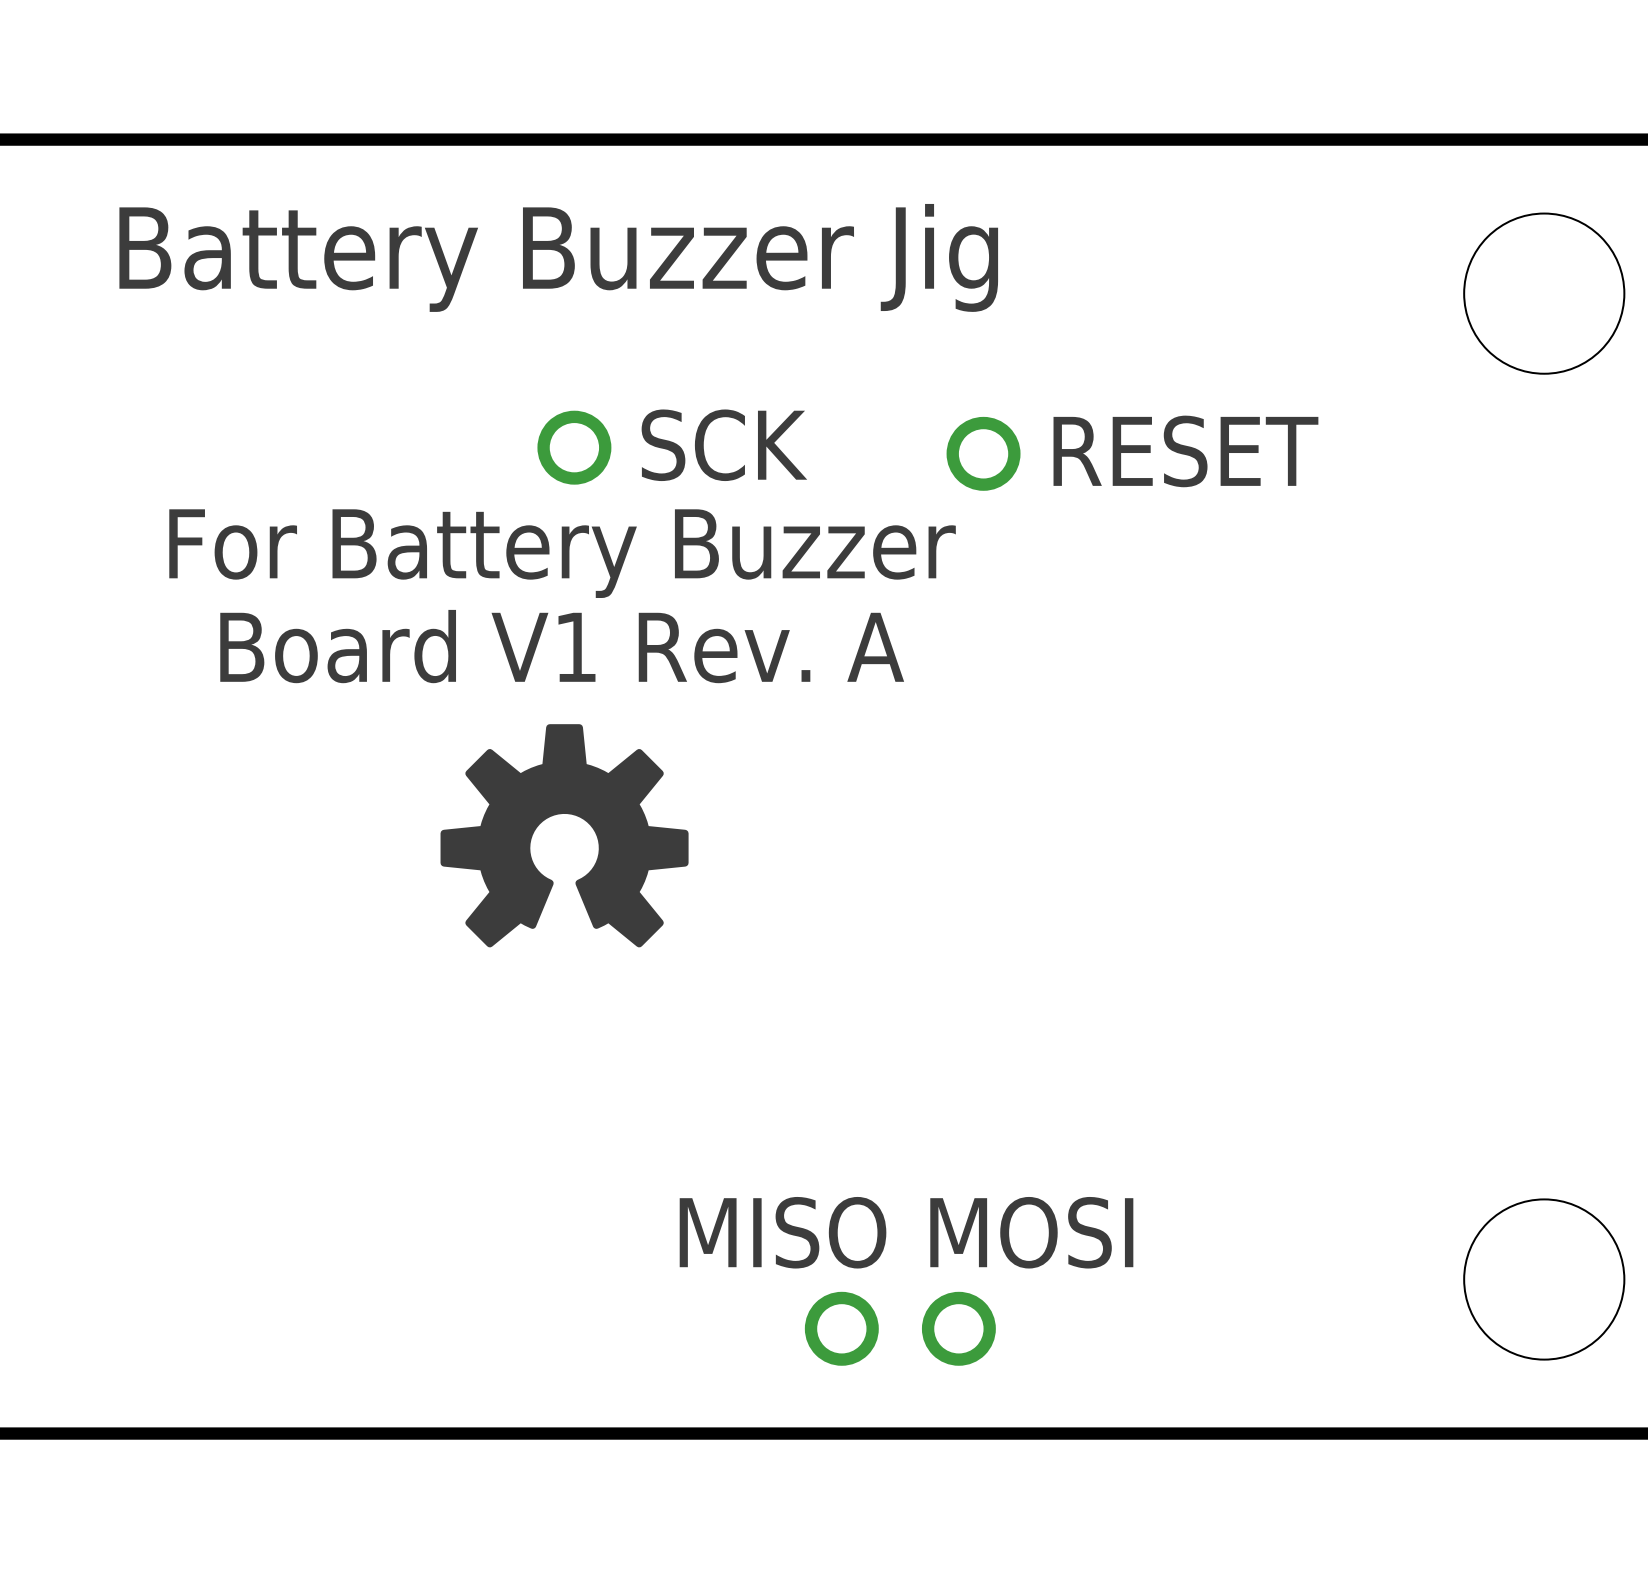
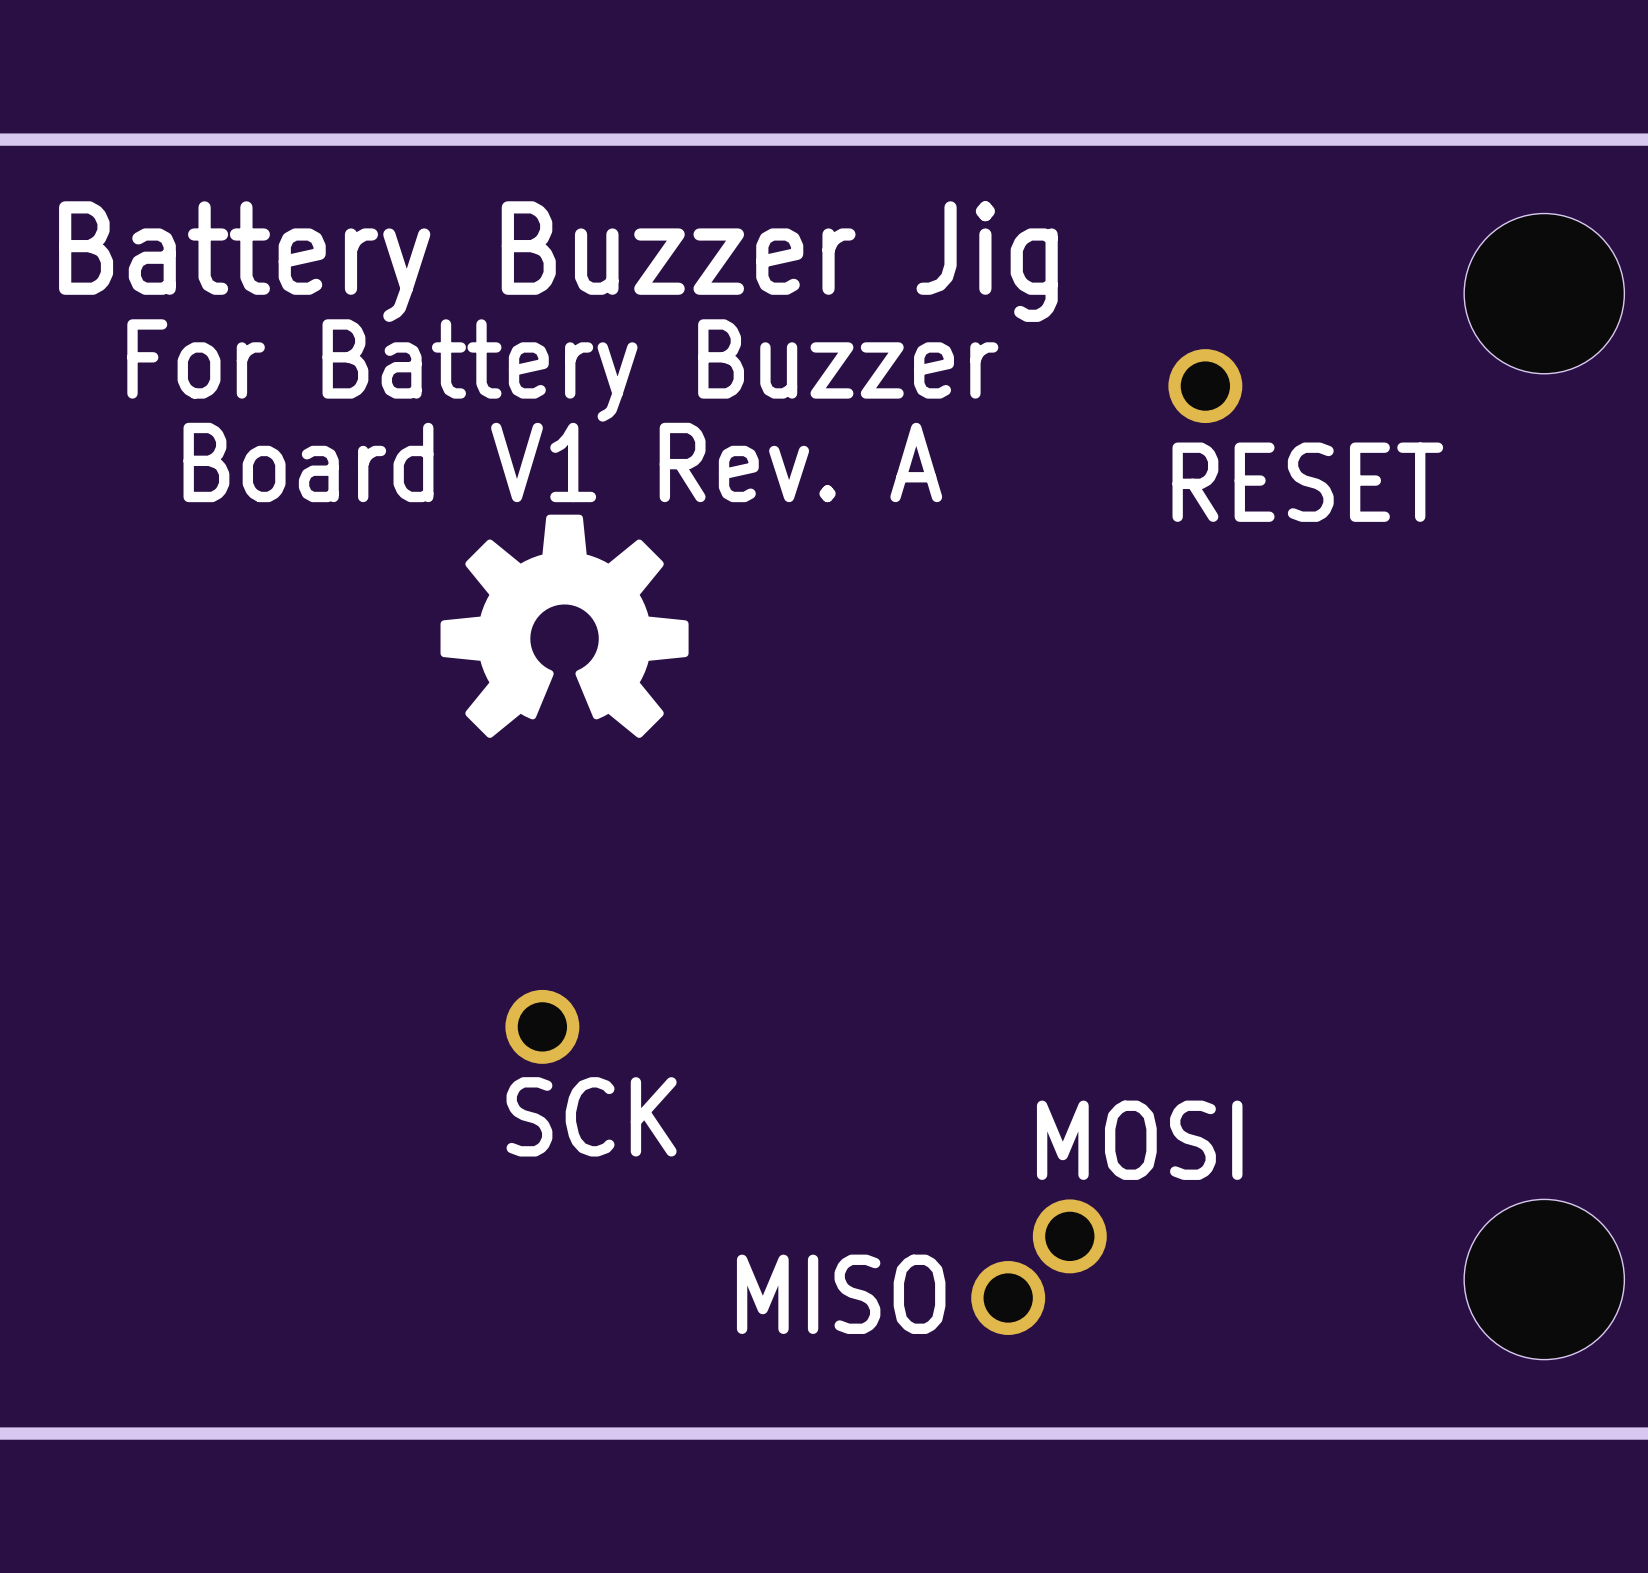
SCK name position: SCK (724, 445) -> SCK (591, 1116)
SCK position: (574, 447) -> (542, 1026)
RESET name position: RESET (1185, 451) -> RESET (1307, 482)
RESET position: (983, 453) -> (1205, 386)
text position: For Battery Buzzer (562, 553) -> For Battery Buzzer (562, 370)
text position: Board V1 Rev. A (562, 646) -> Board V1 Rev. A (562, 462)
drawing position: (564, 835) -> (564, 626)
MISO name position: MISO (783, 1232) -> MISO (841, 1294)
MOSI name position: MOSI (1031, 1232) -> MOSI (1139, 1140)
MISO position: (841, 1328) -> (1008, 1297)
MOSI position: (958, 1328) -> (1069, 1236)

